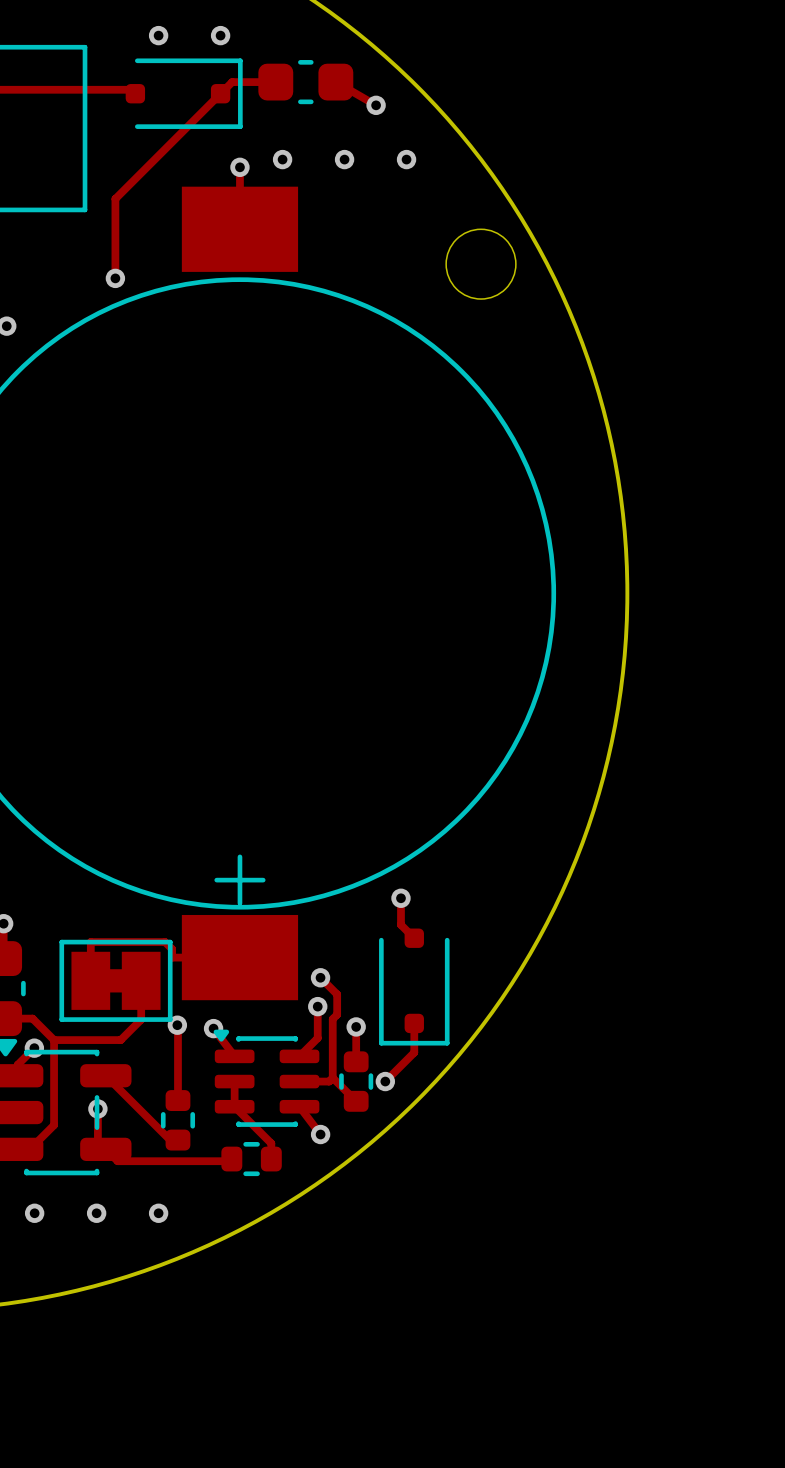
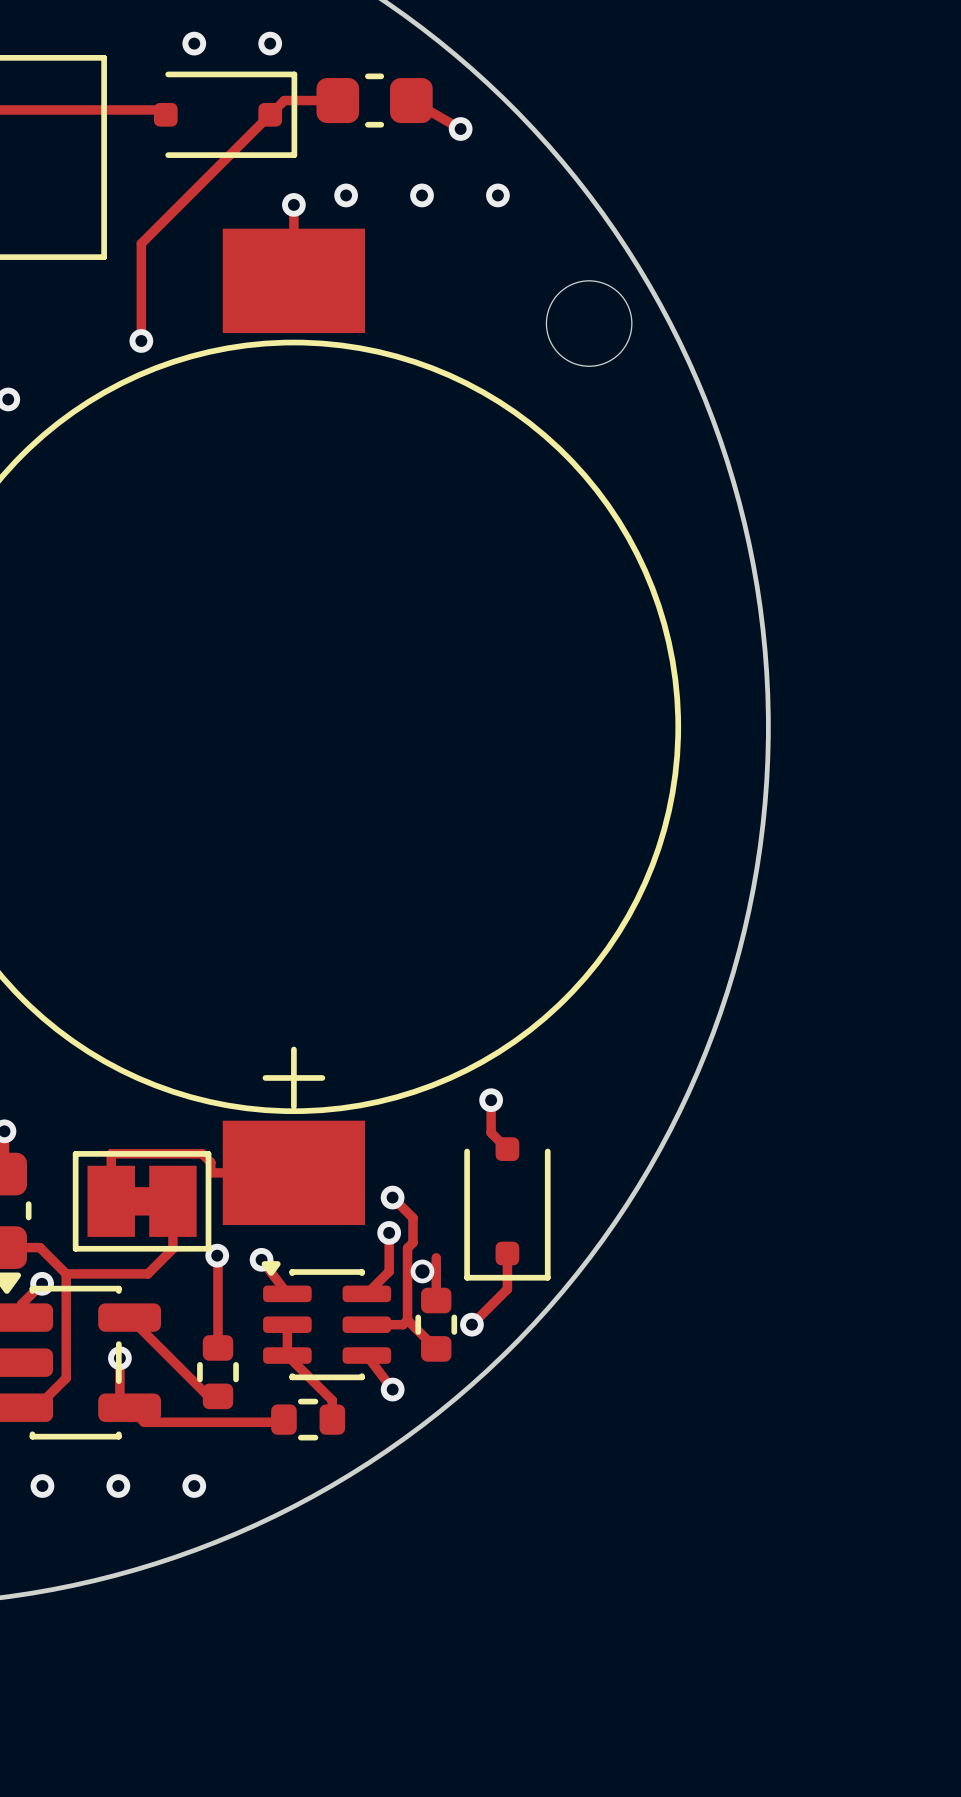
via position: (356, 1026) -> (422, 1271)

